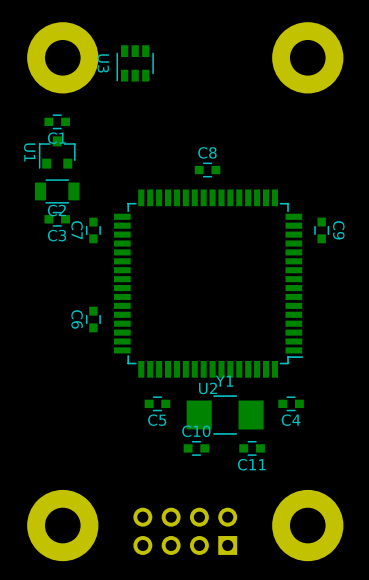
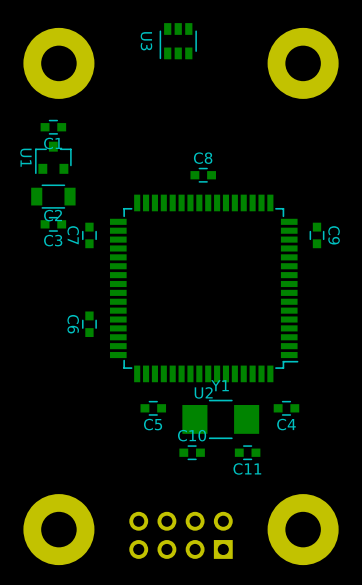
U3 position: (135, 63) -> (178, 41)

